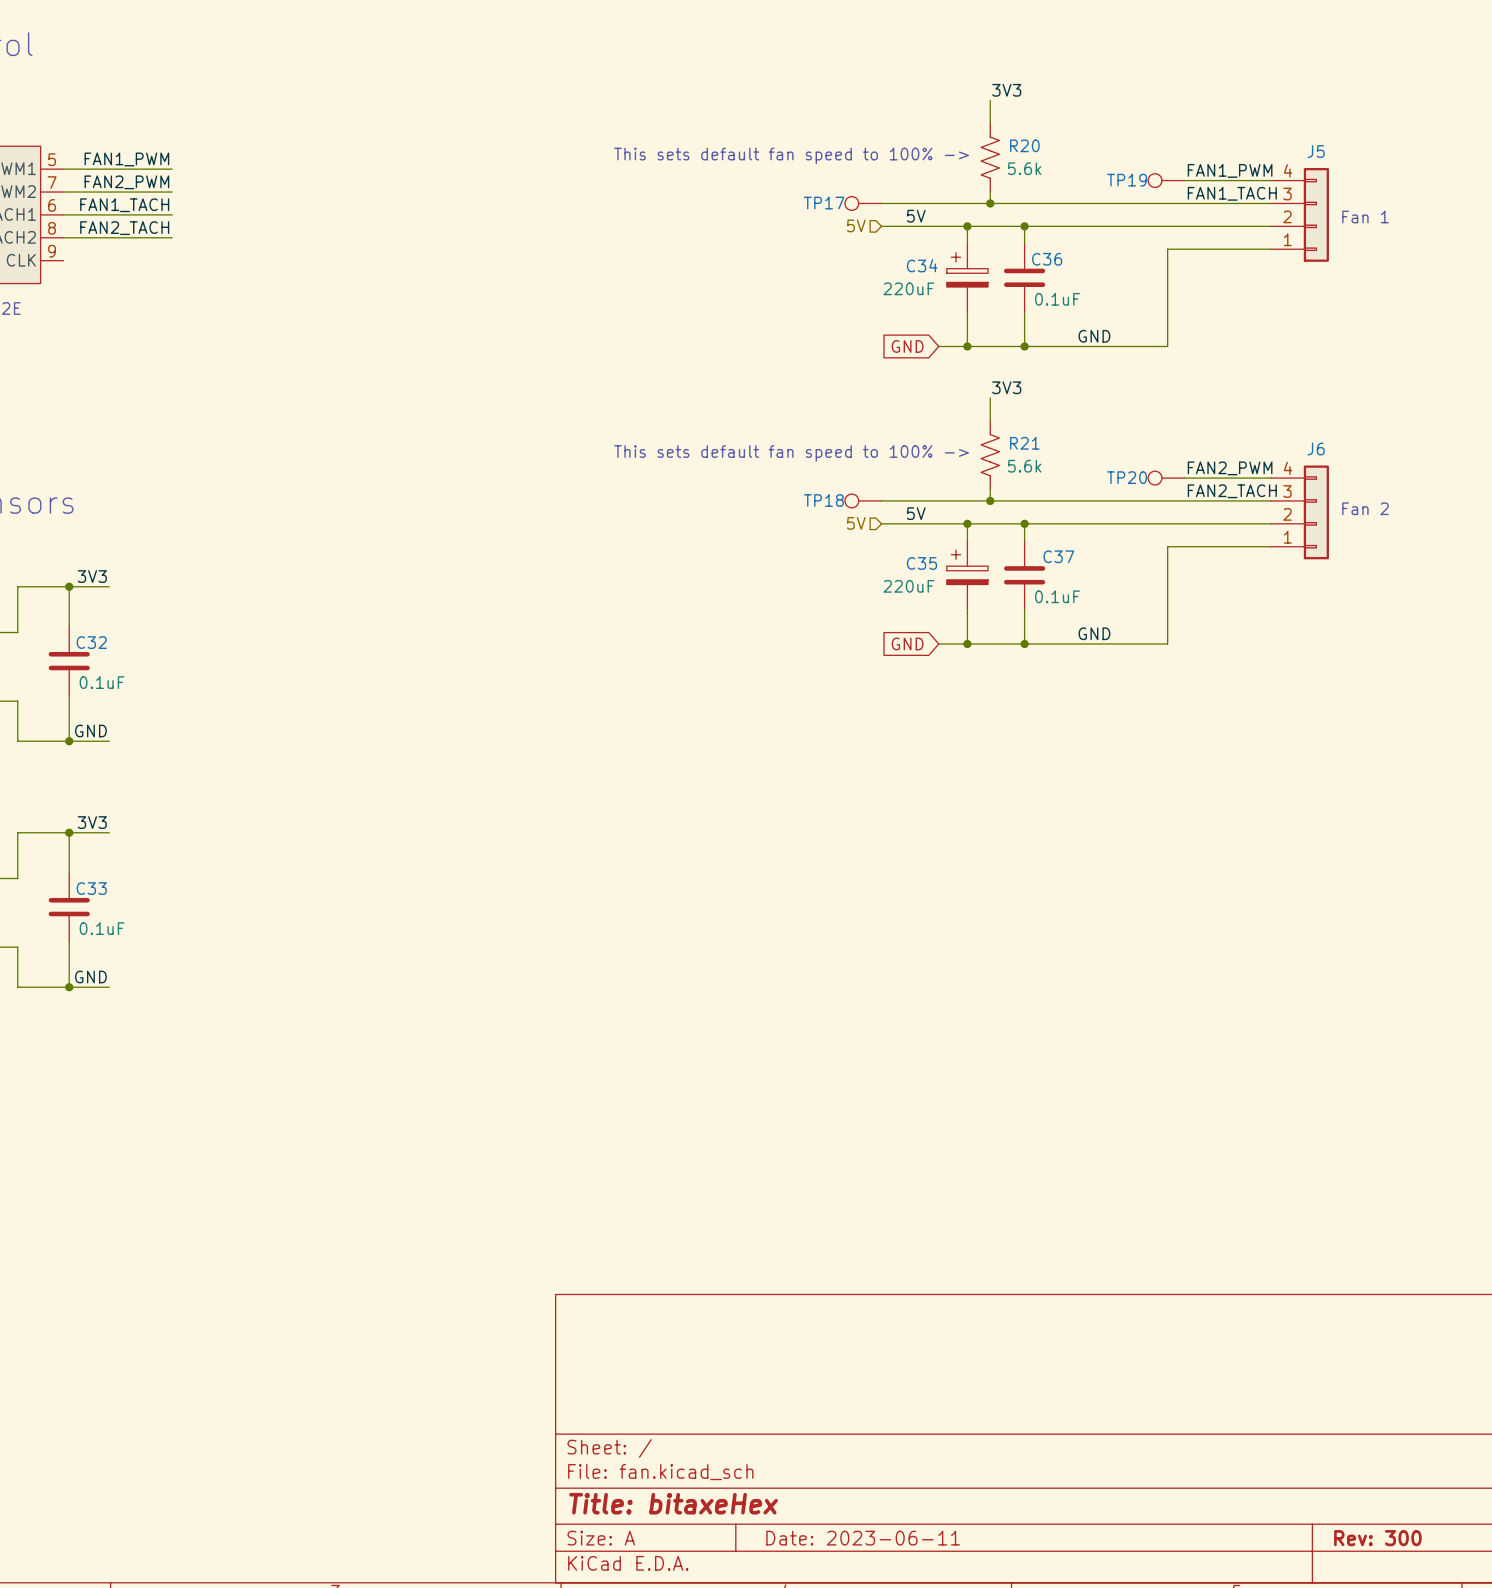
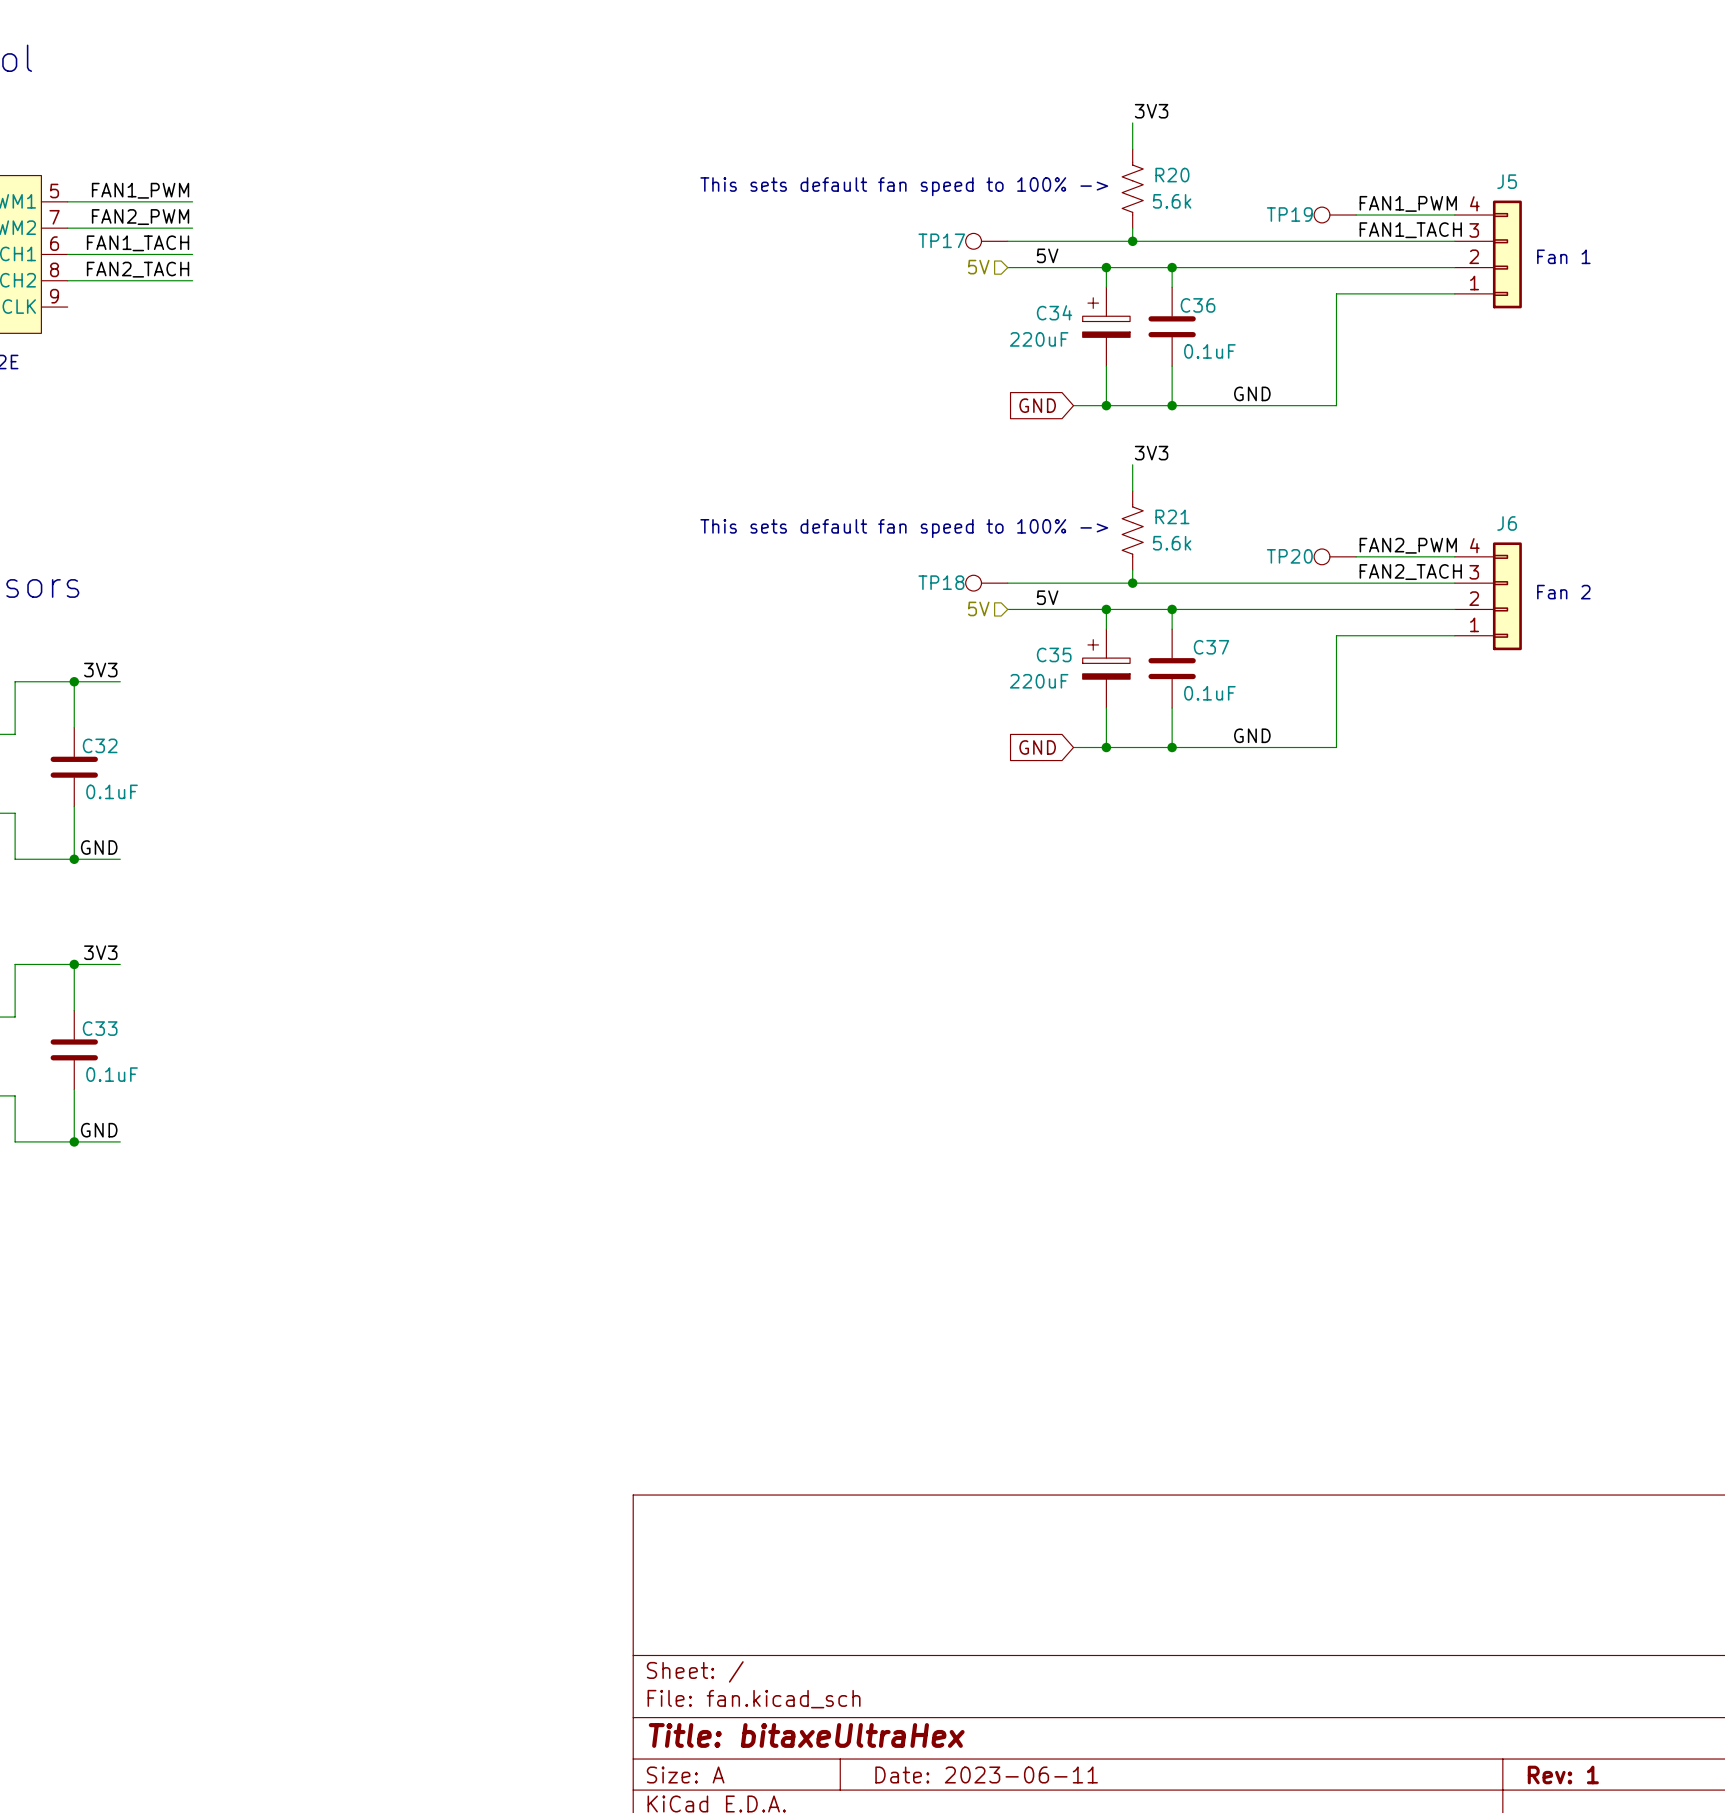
title block: Title: bitaxeHex (673, 1503) -> Title: bitaxeUltraHex (806, 1735)
title block: Rev: 300 (1377, 1538) -> Rev: 1 (1563, 1775)

